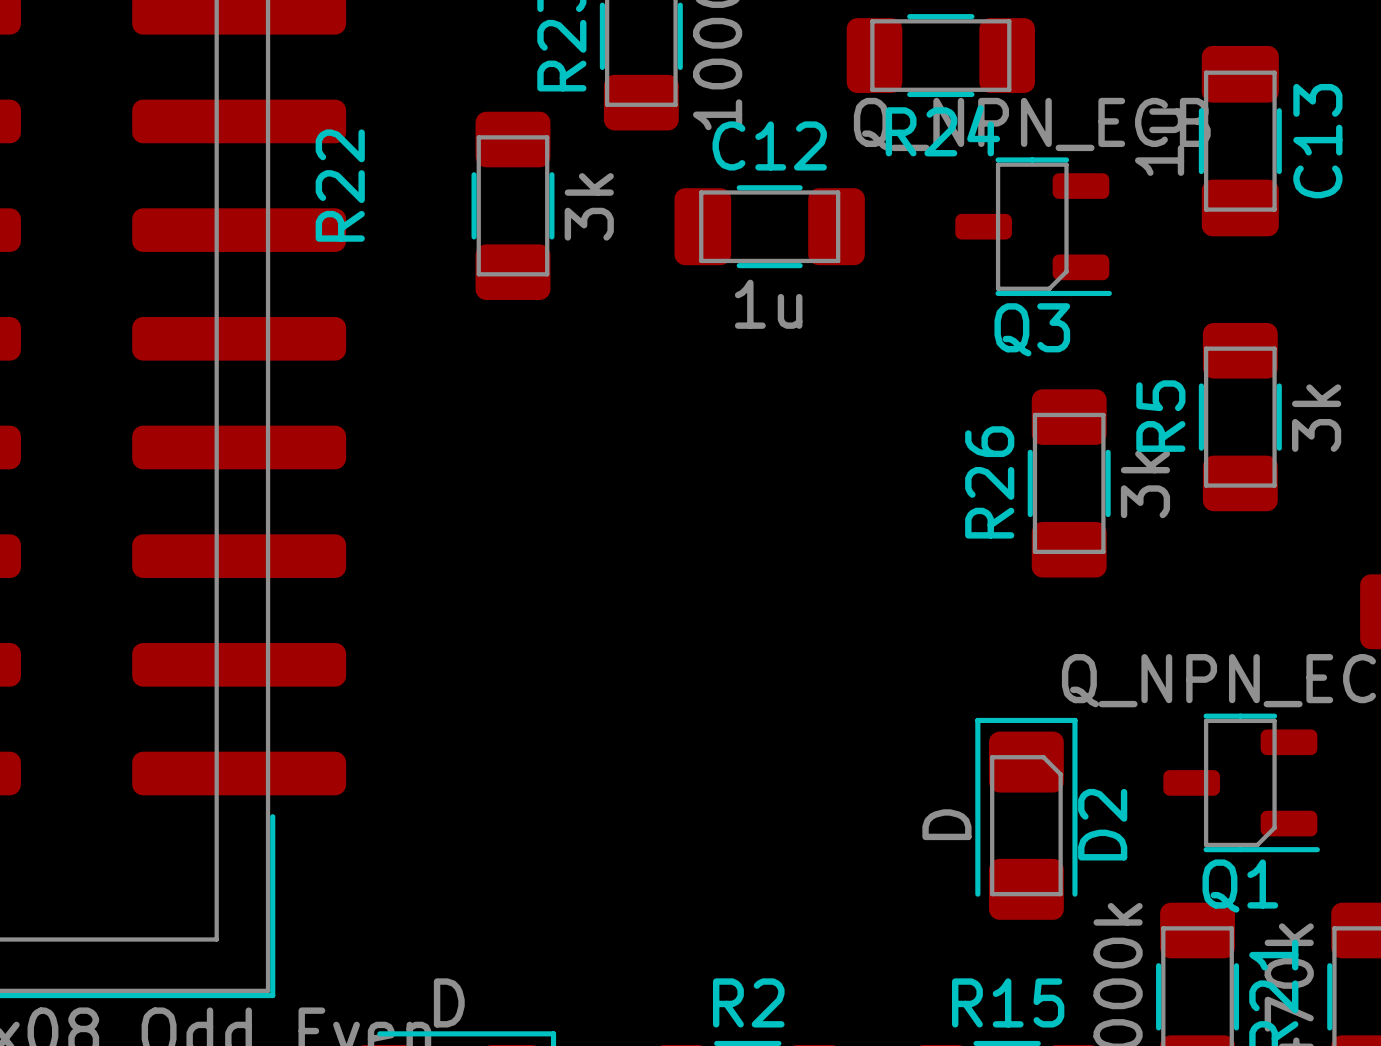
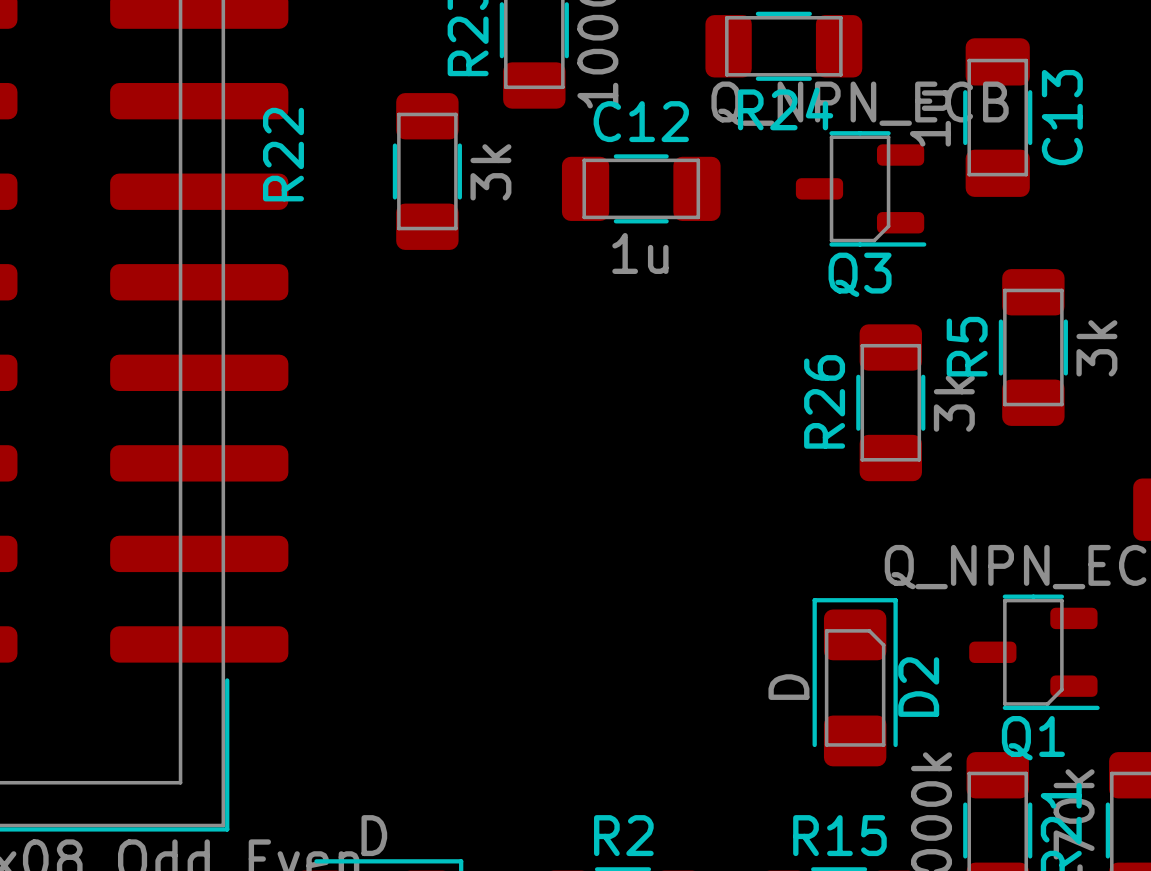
C13 position: (1240, 141) -> (997, 117)

